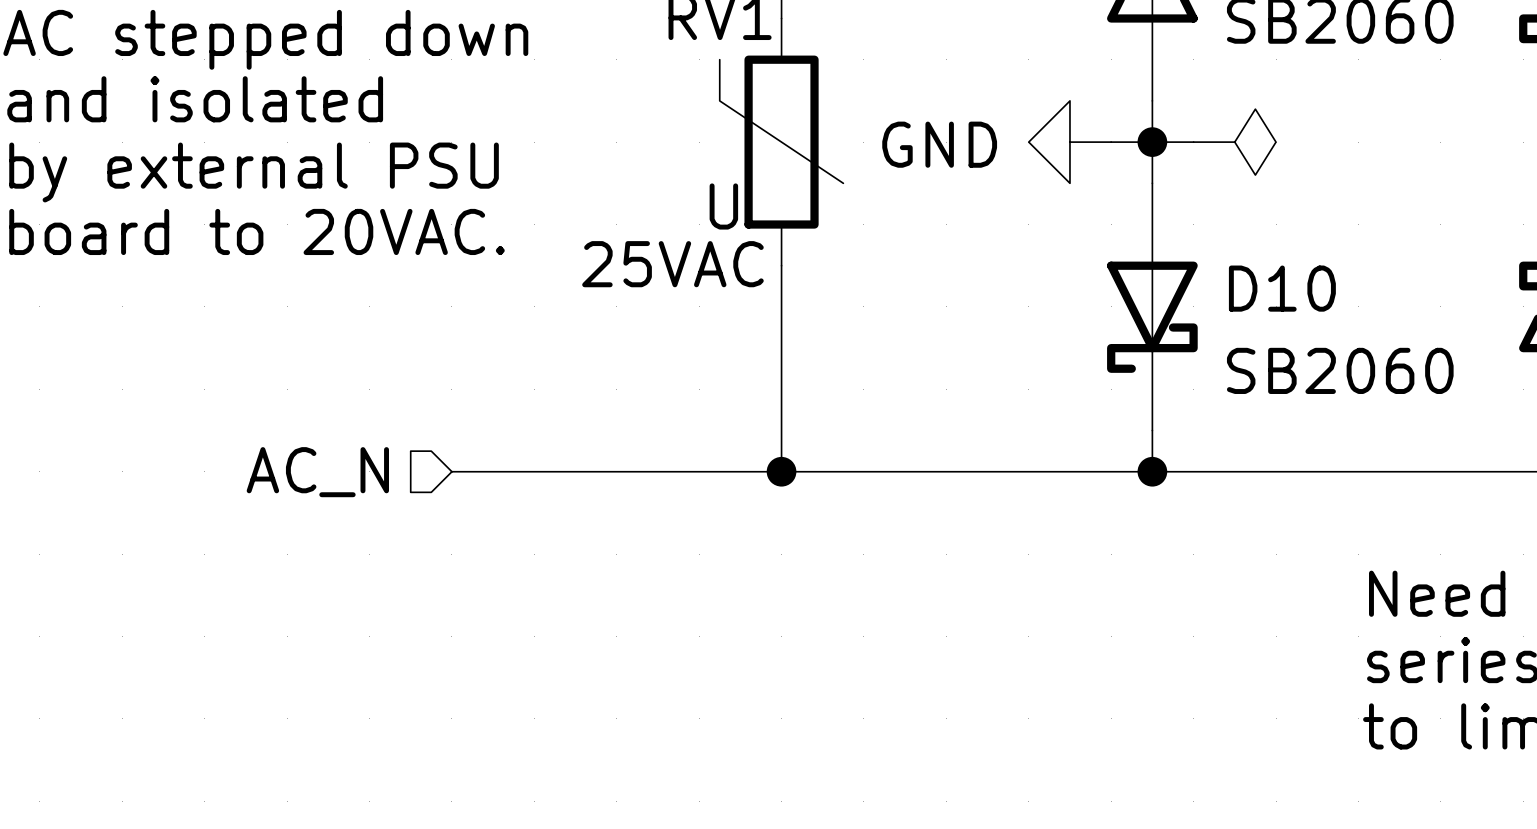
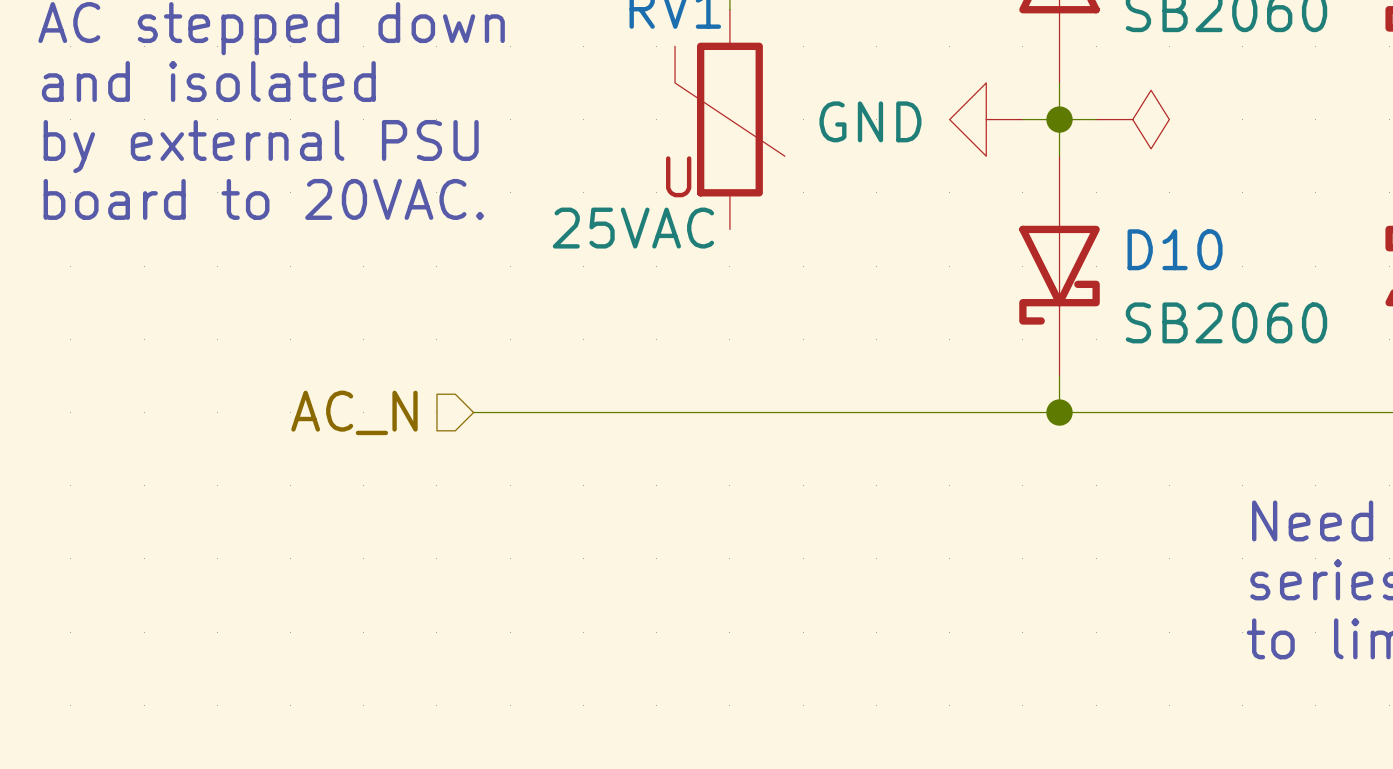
wire: (781, 265) (781, 471) -> none
wire: (451, 471) (493, 471) -> none
junction: (781, 471) -> none
hierarchical label position: AC_N (317, 472) -> AC_N (354, 412)

